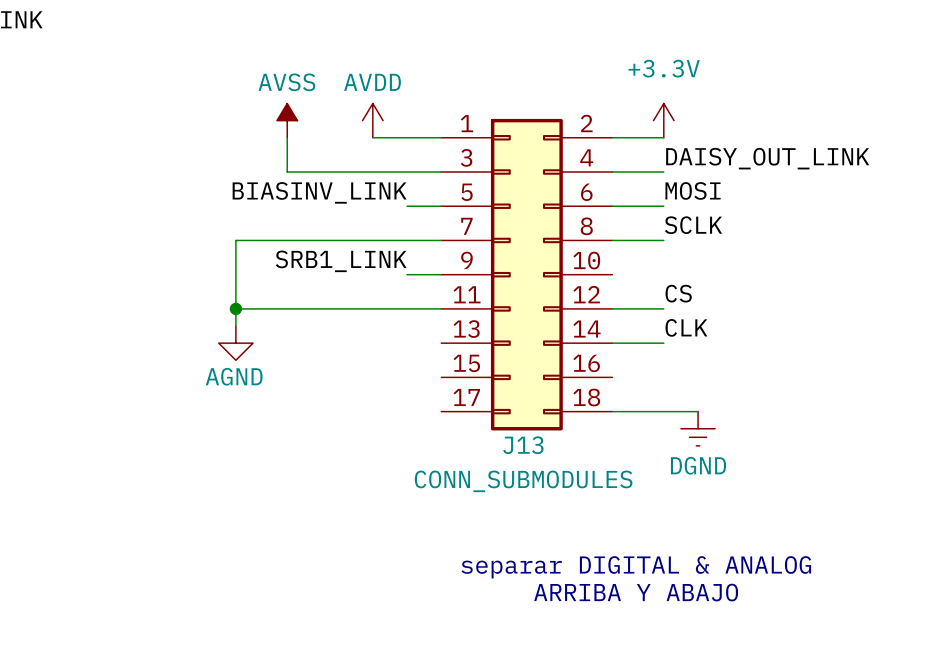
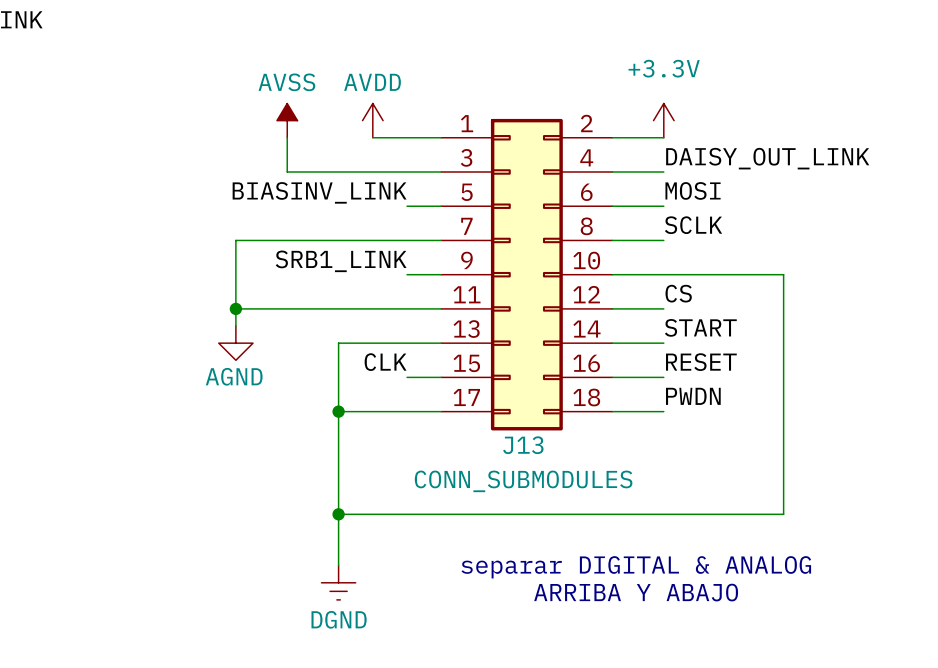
wire: none -> (612, 274) (783, 274) (783, 514) (338, 514)
label: CLK (686, 327) -> START (700, 327)
wire: none -> (441, 343) (338, 343) (338, 565)
label: none -> CLK (385, 362)
label: none -> RESET (701, 362)
wire: none -> (612, 377) (663, 377)
label: none -> PWDN (693, 396)
wire: none -> (338, 411) (441, 411)
junction: none -> (338, 411)
wire: (663, 411) (698, 411) -> (407, 377) (441, 377)
power symbol: DGND (698, 428) -> none
junction: none -> (338, 514)
power symbol: none -> DGND (338, 582)

